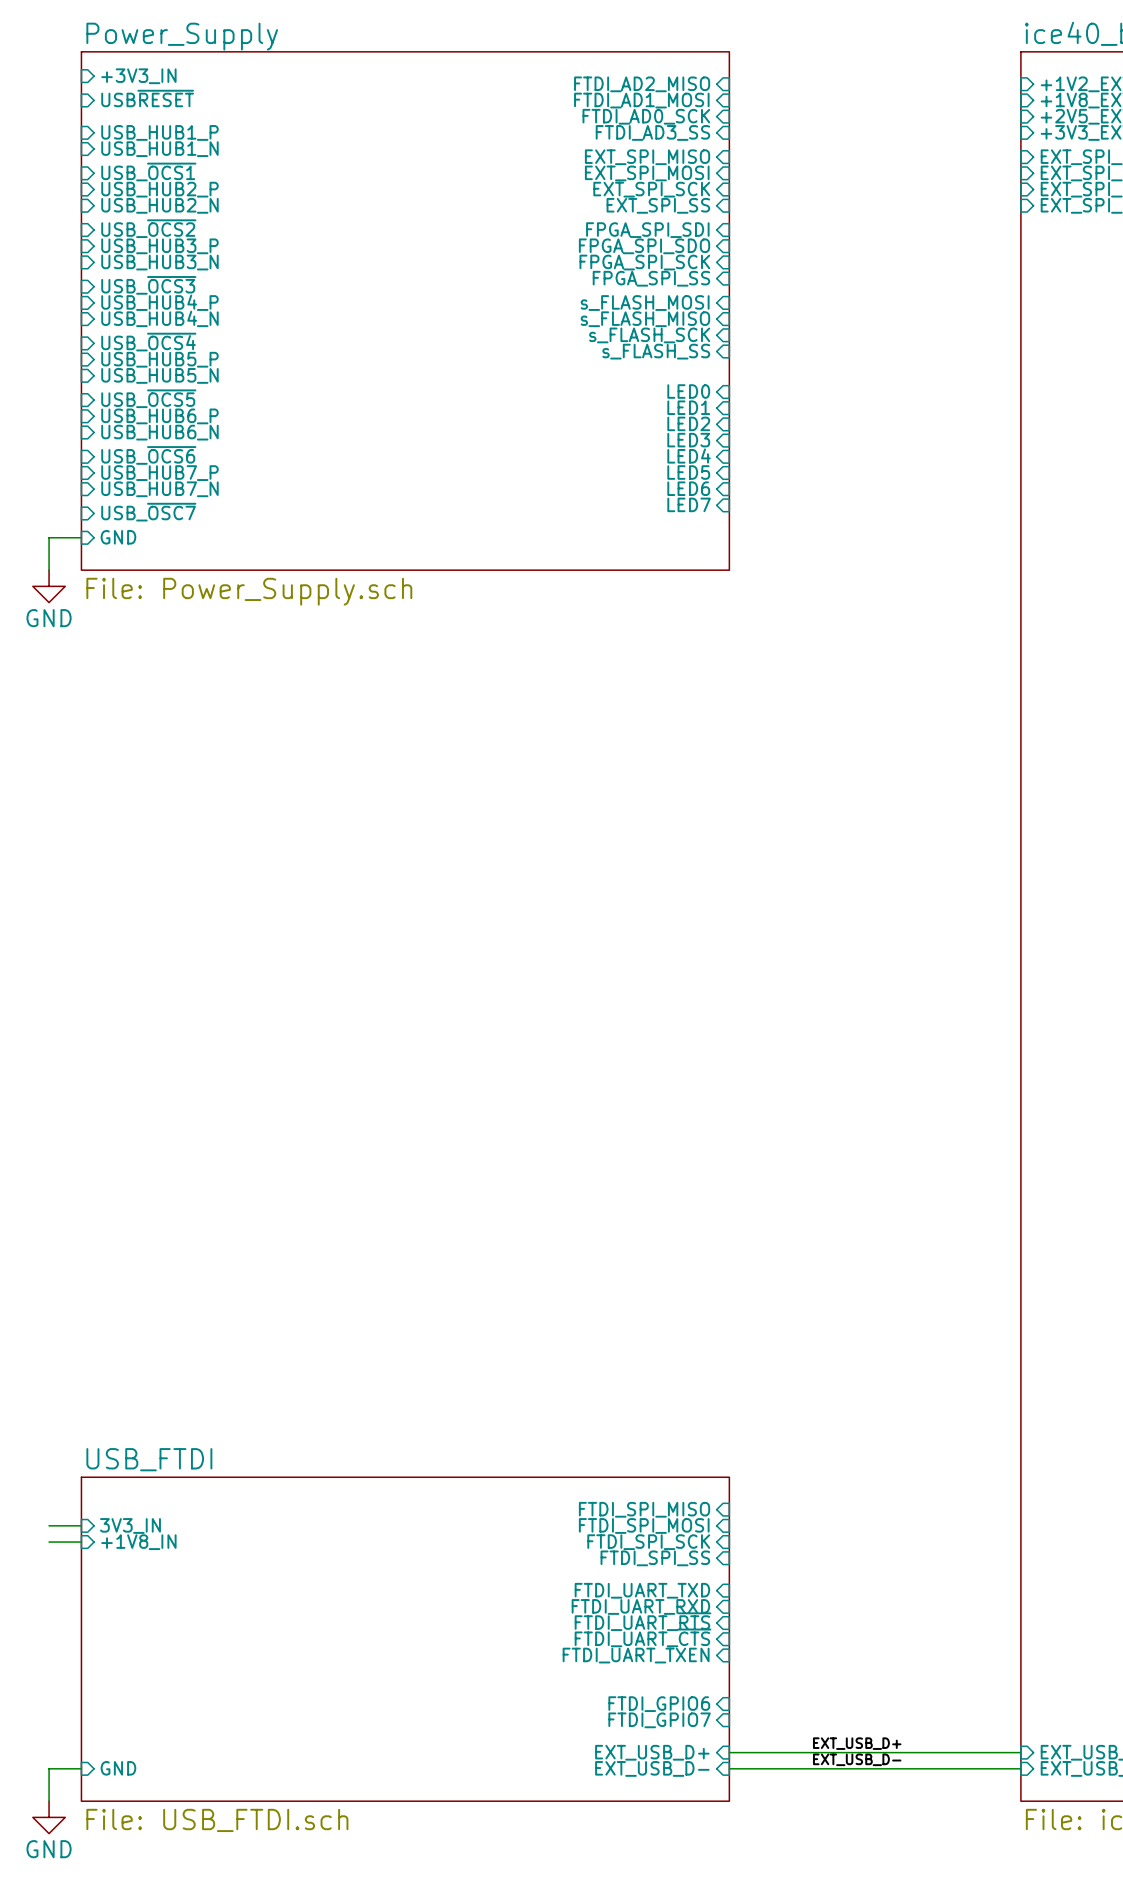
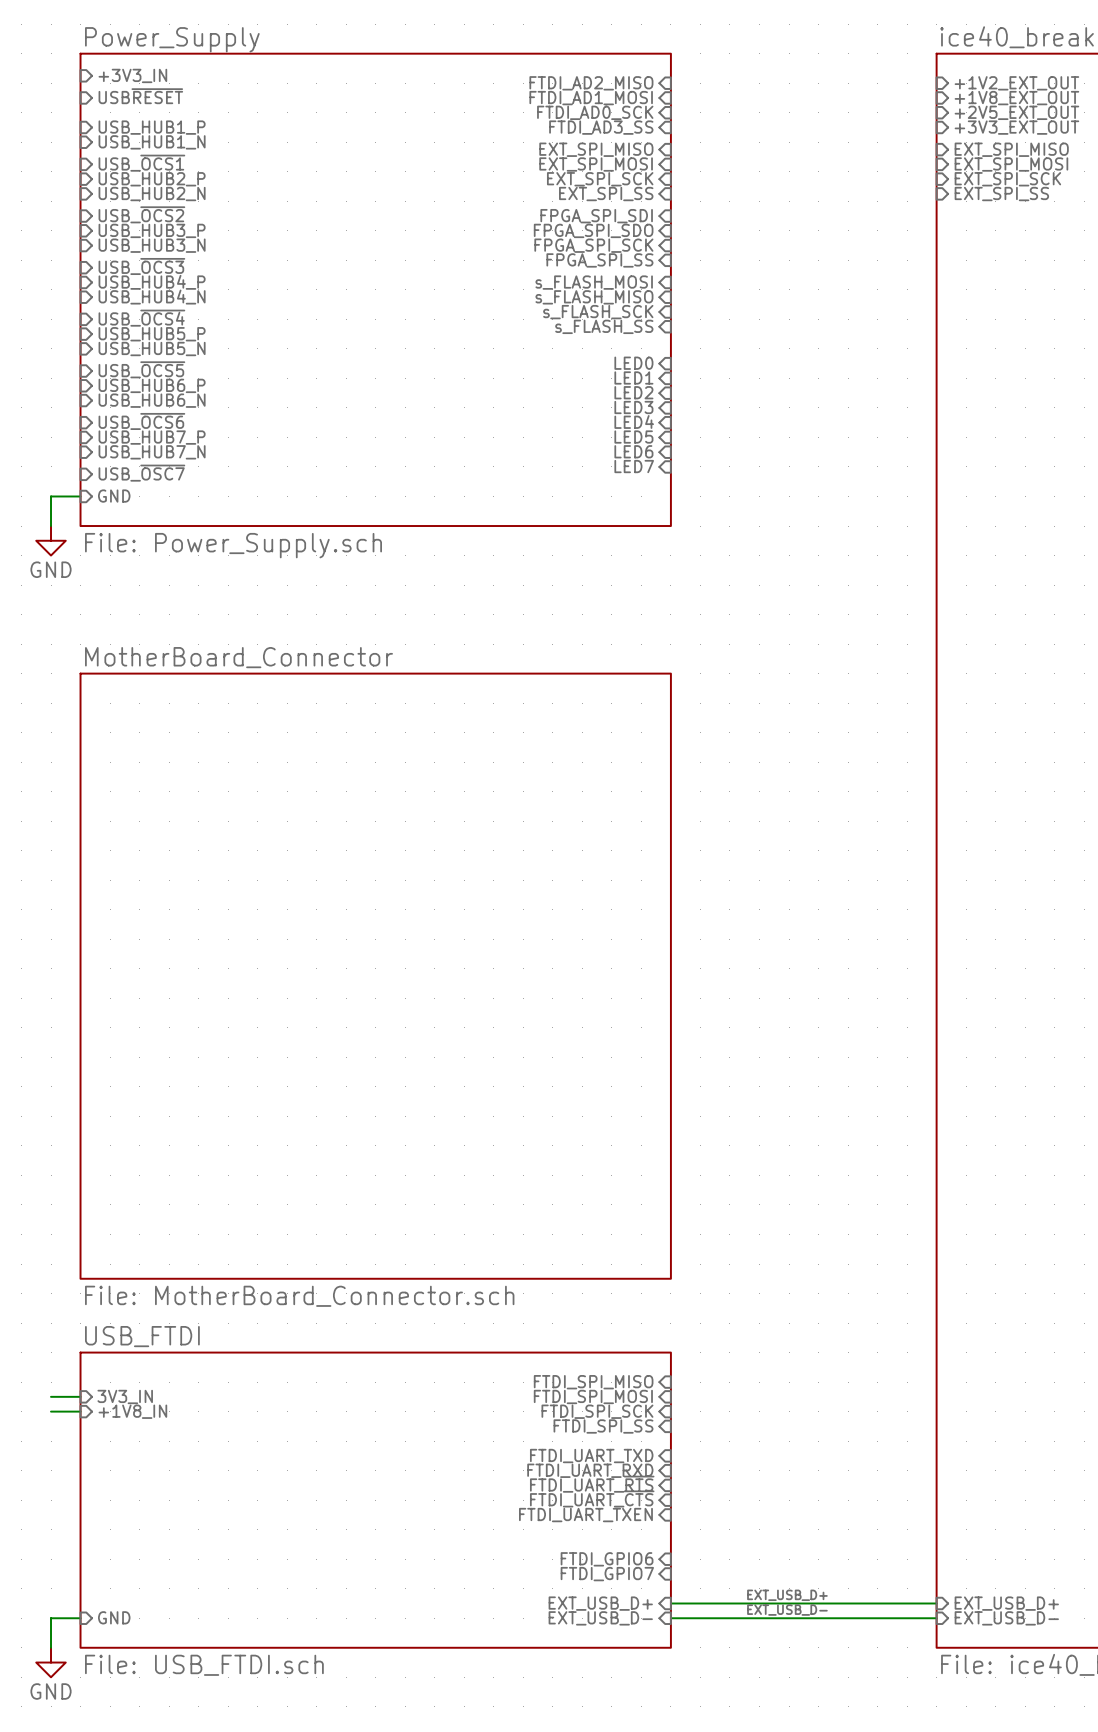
sheet MotherBoard_Connector: none -> File: MotherBoard_Connector.sch (375, 976)

